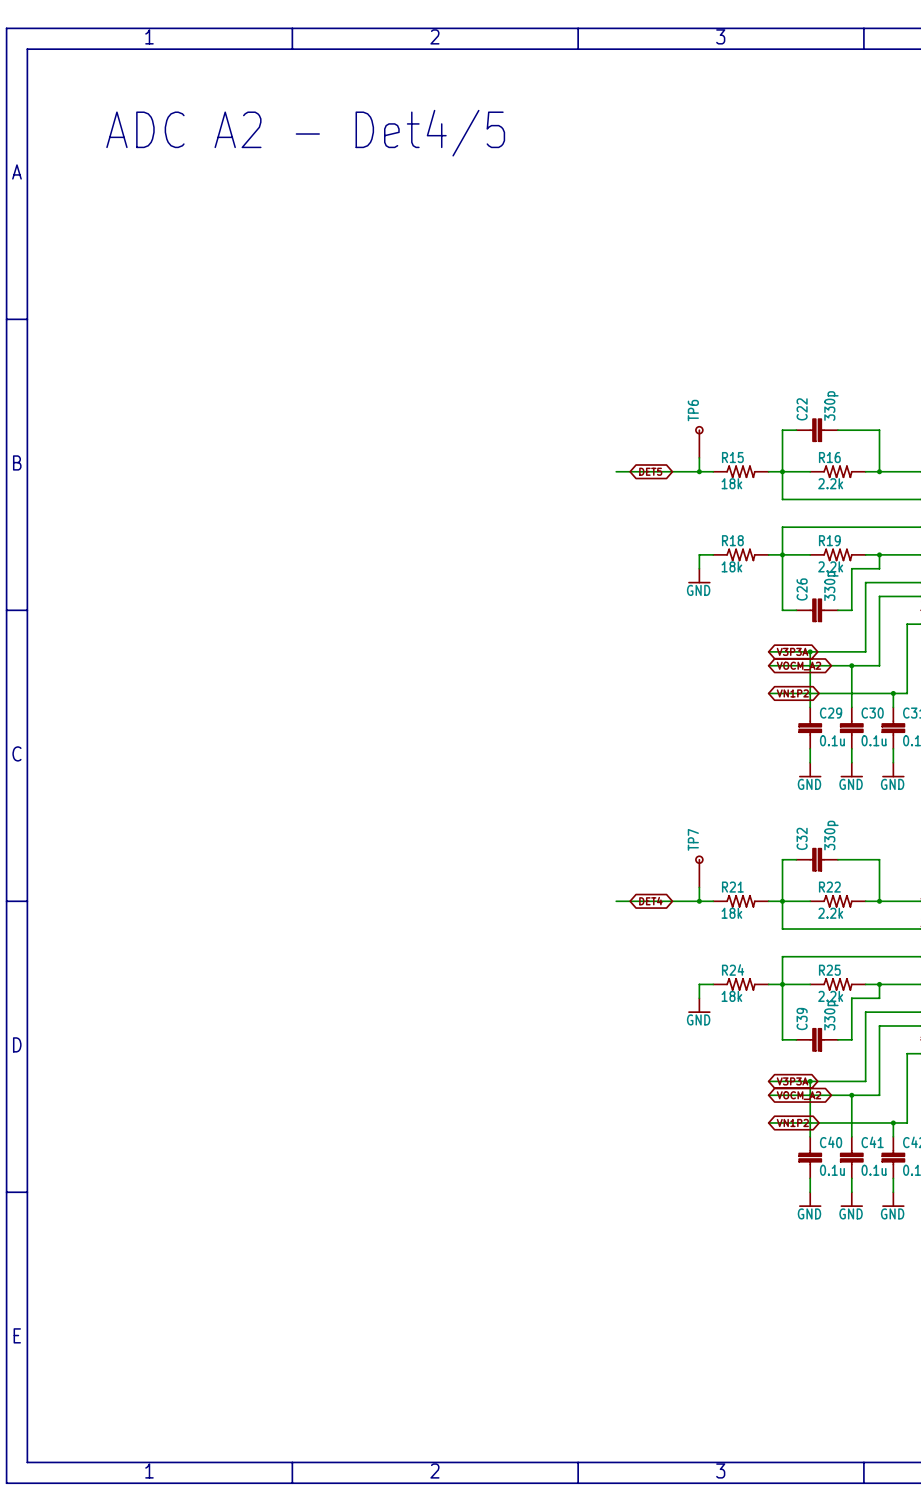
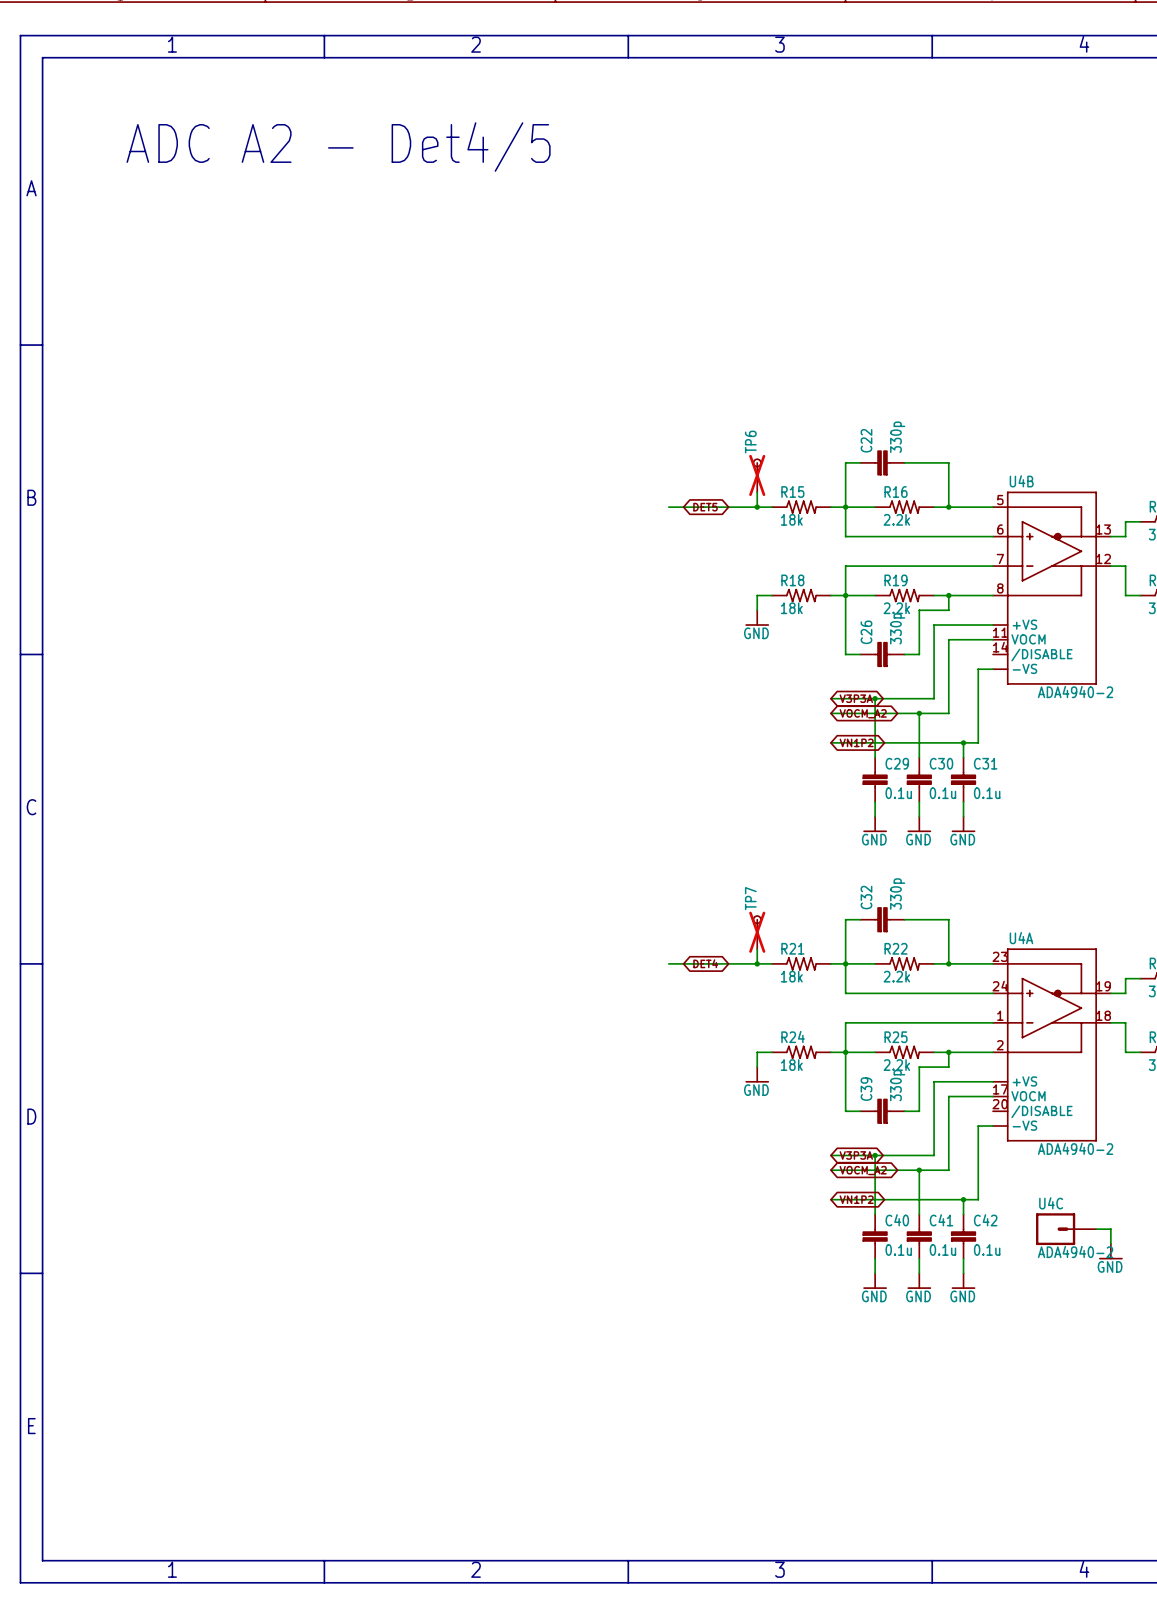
TP6 do-not-place cross: none -> (757, 475)
TP7 do-not-place cross: none -> (757, 932)

